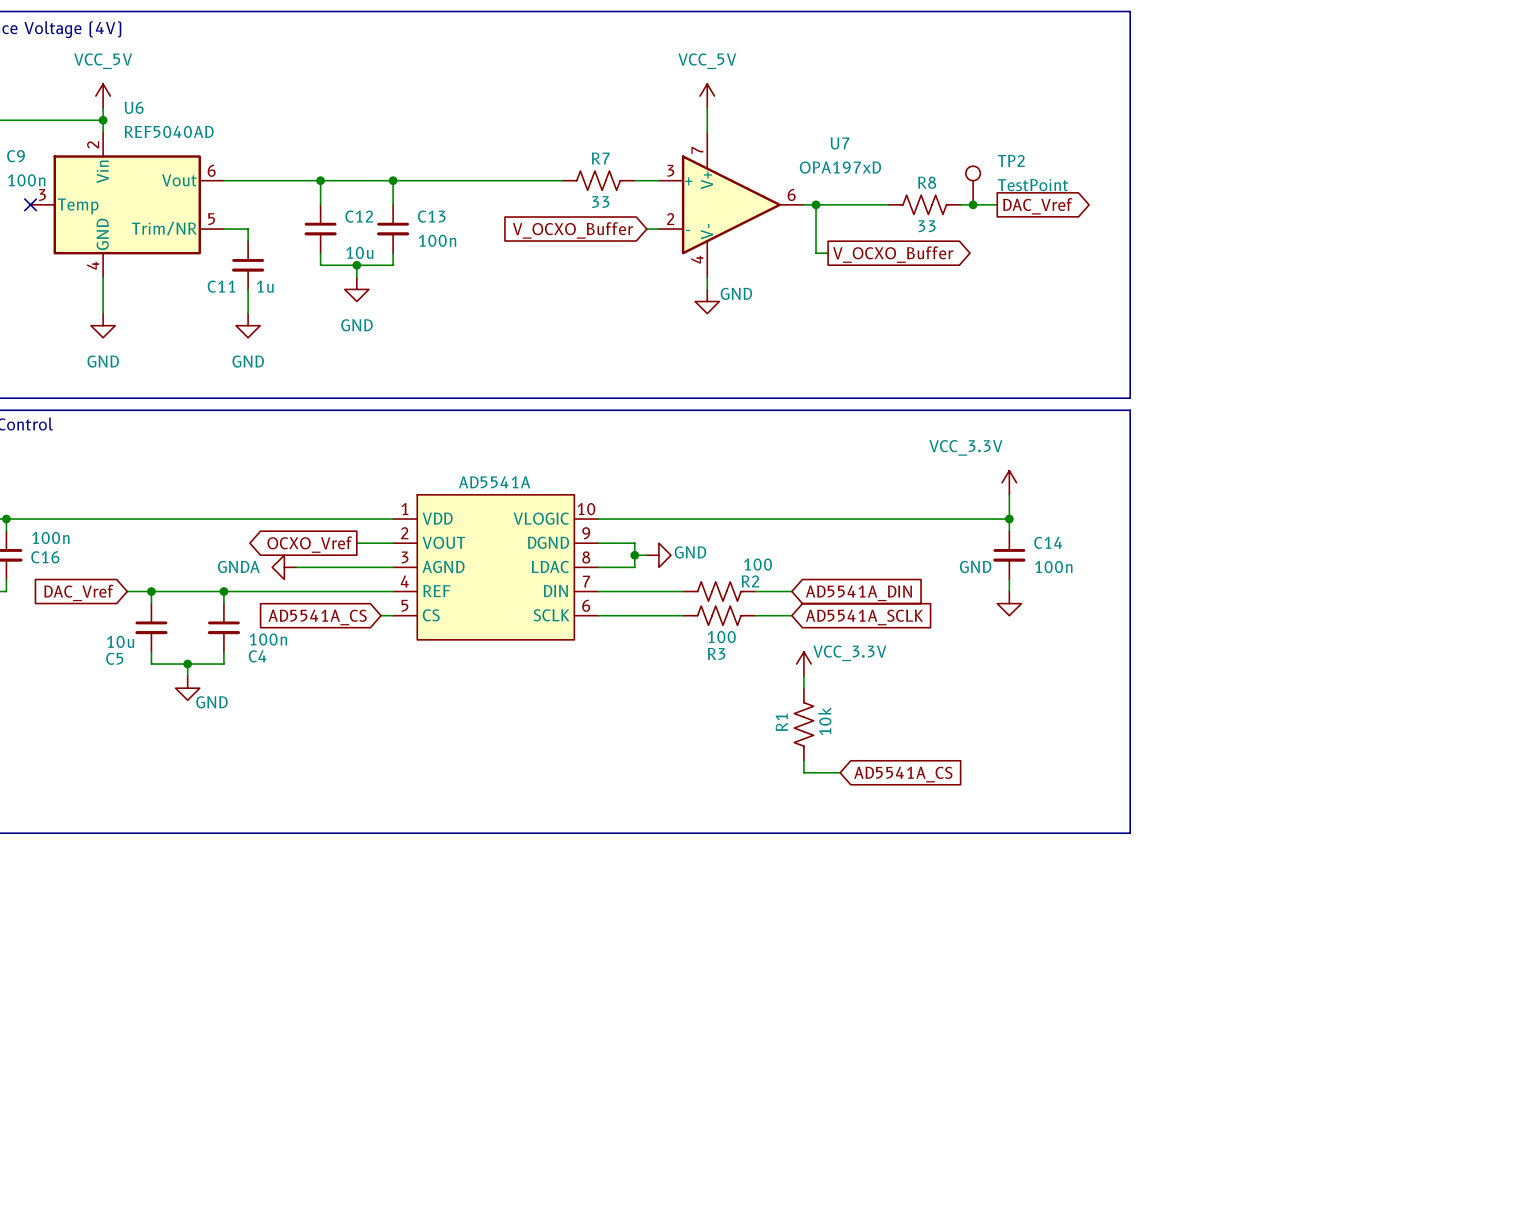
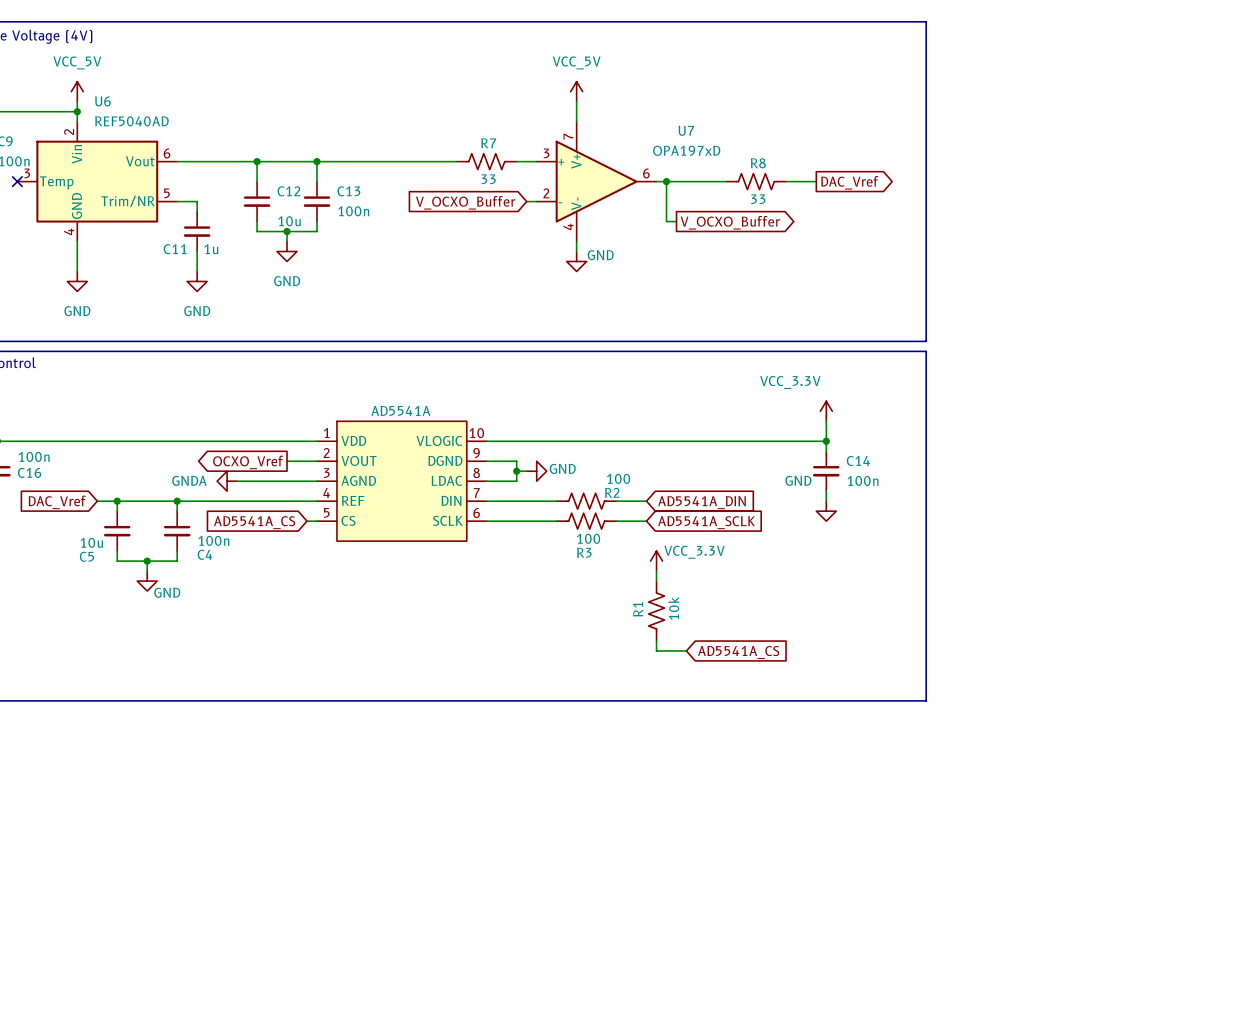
TP2: TestPoint (973, 185) -> none
junction: (973, 204) -> none

